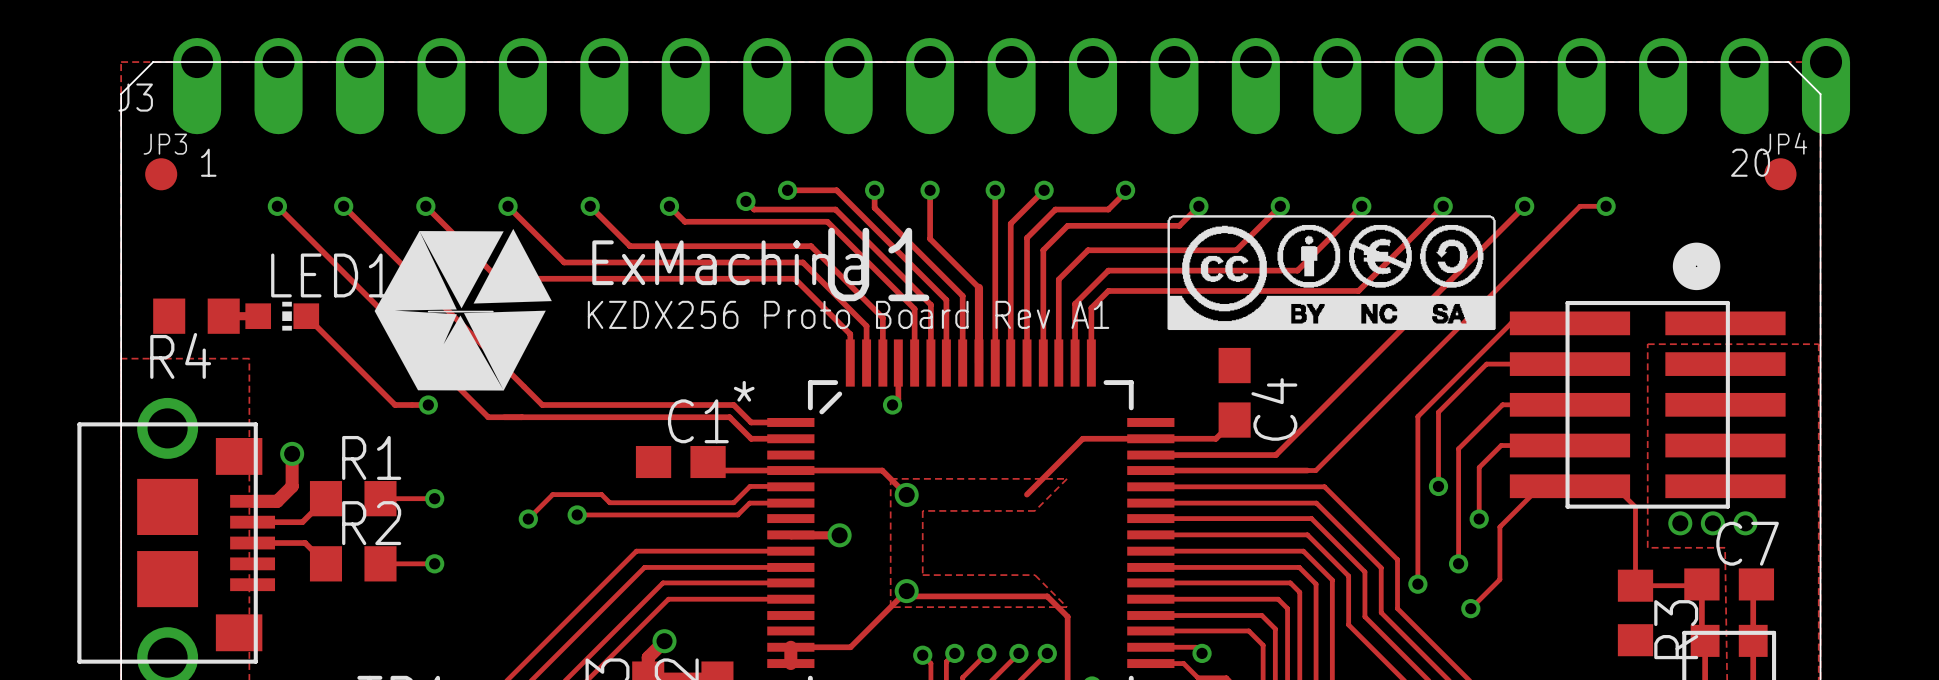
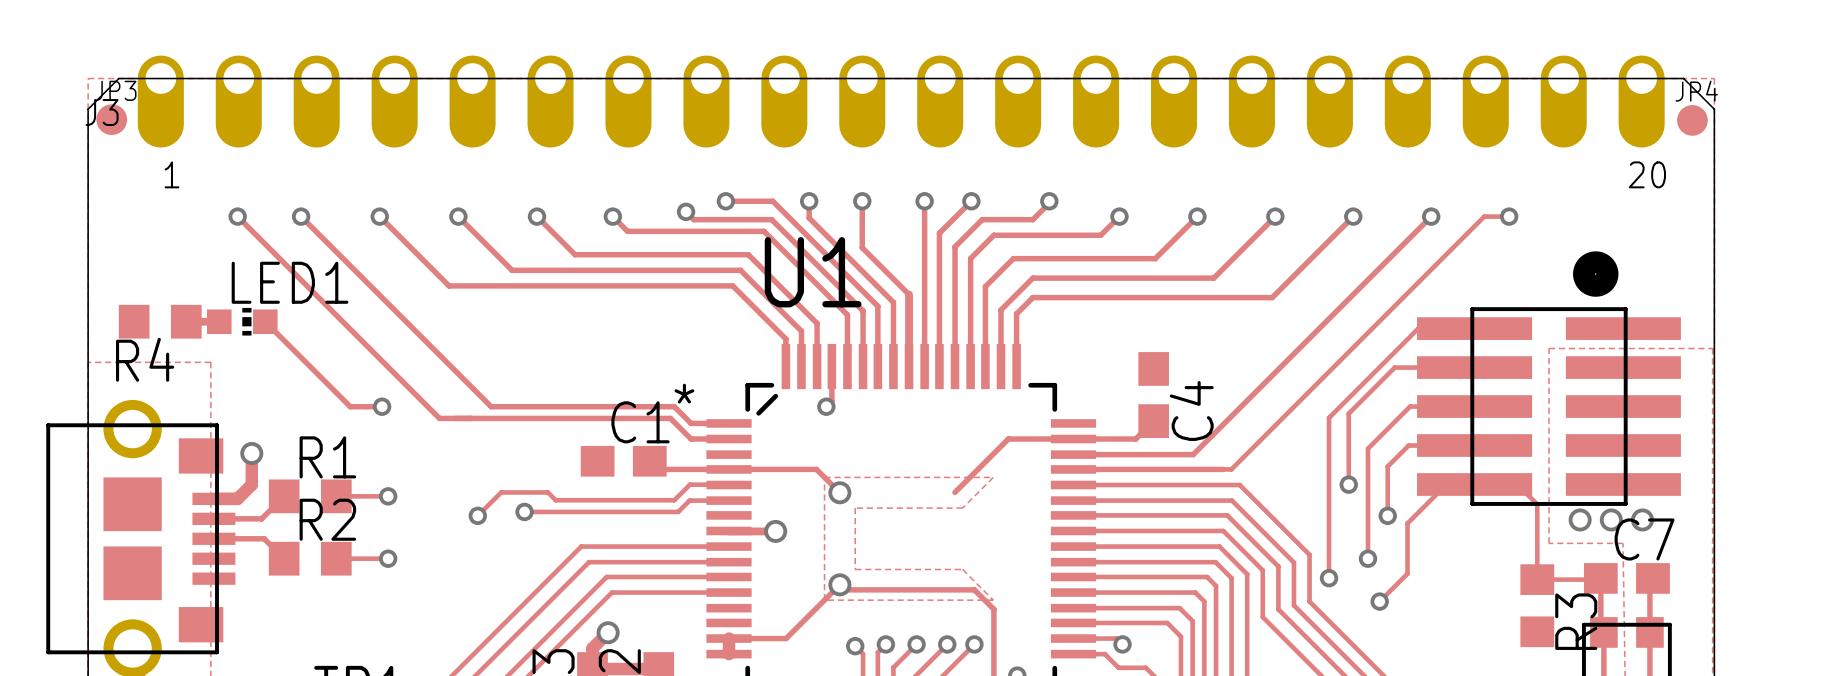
part: none -> (901, 101)
part: (1011, 86) -> none
JP3 position: (161, 174) -> (111, 119)
JP4 position: (1780, 174) -> (1692, 120)
drawing: [1167, 215, 1496, 331] -> none
drawing: [374, 228, 552, 391] -> none
text: KZDX256 Proto Board Rev A1 (848, 314) -> none

